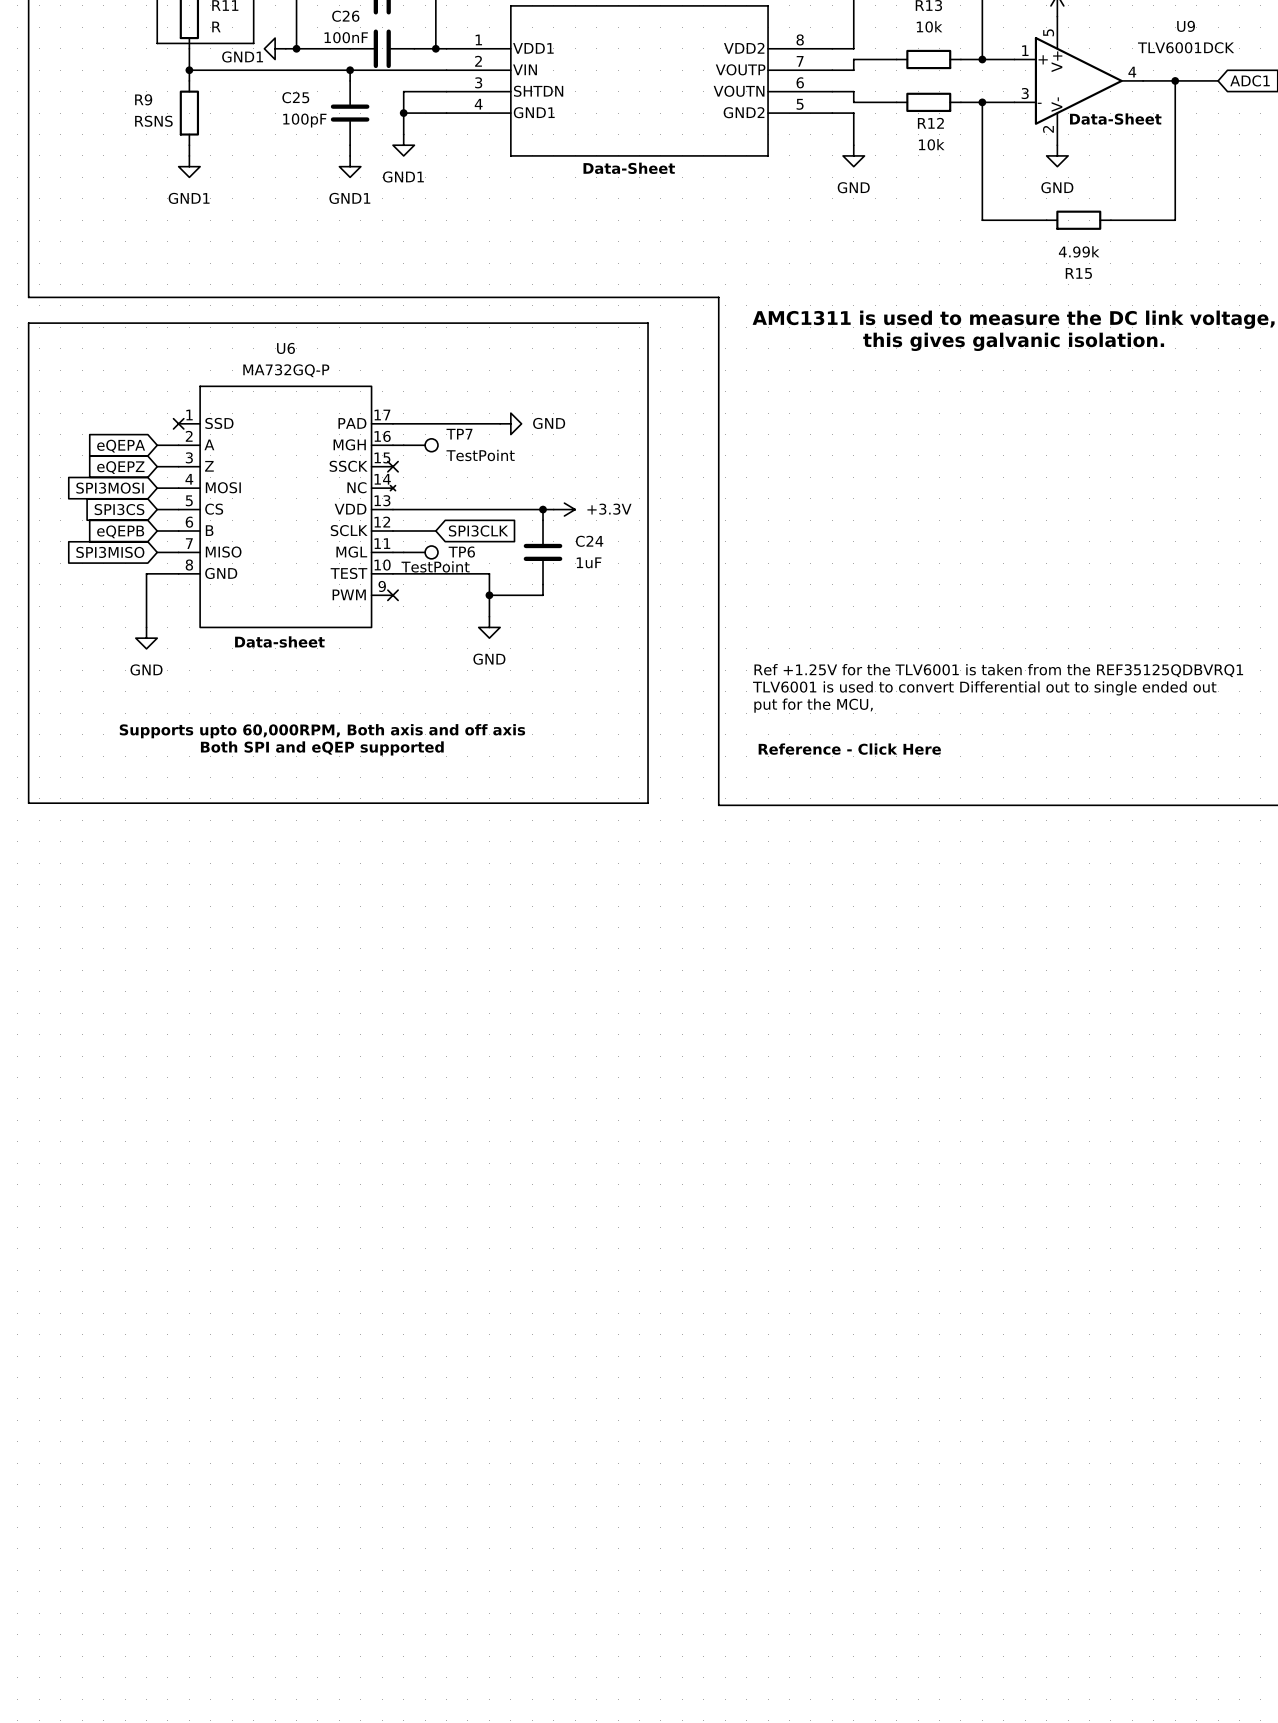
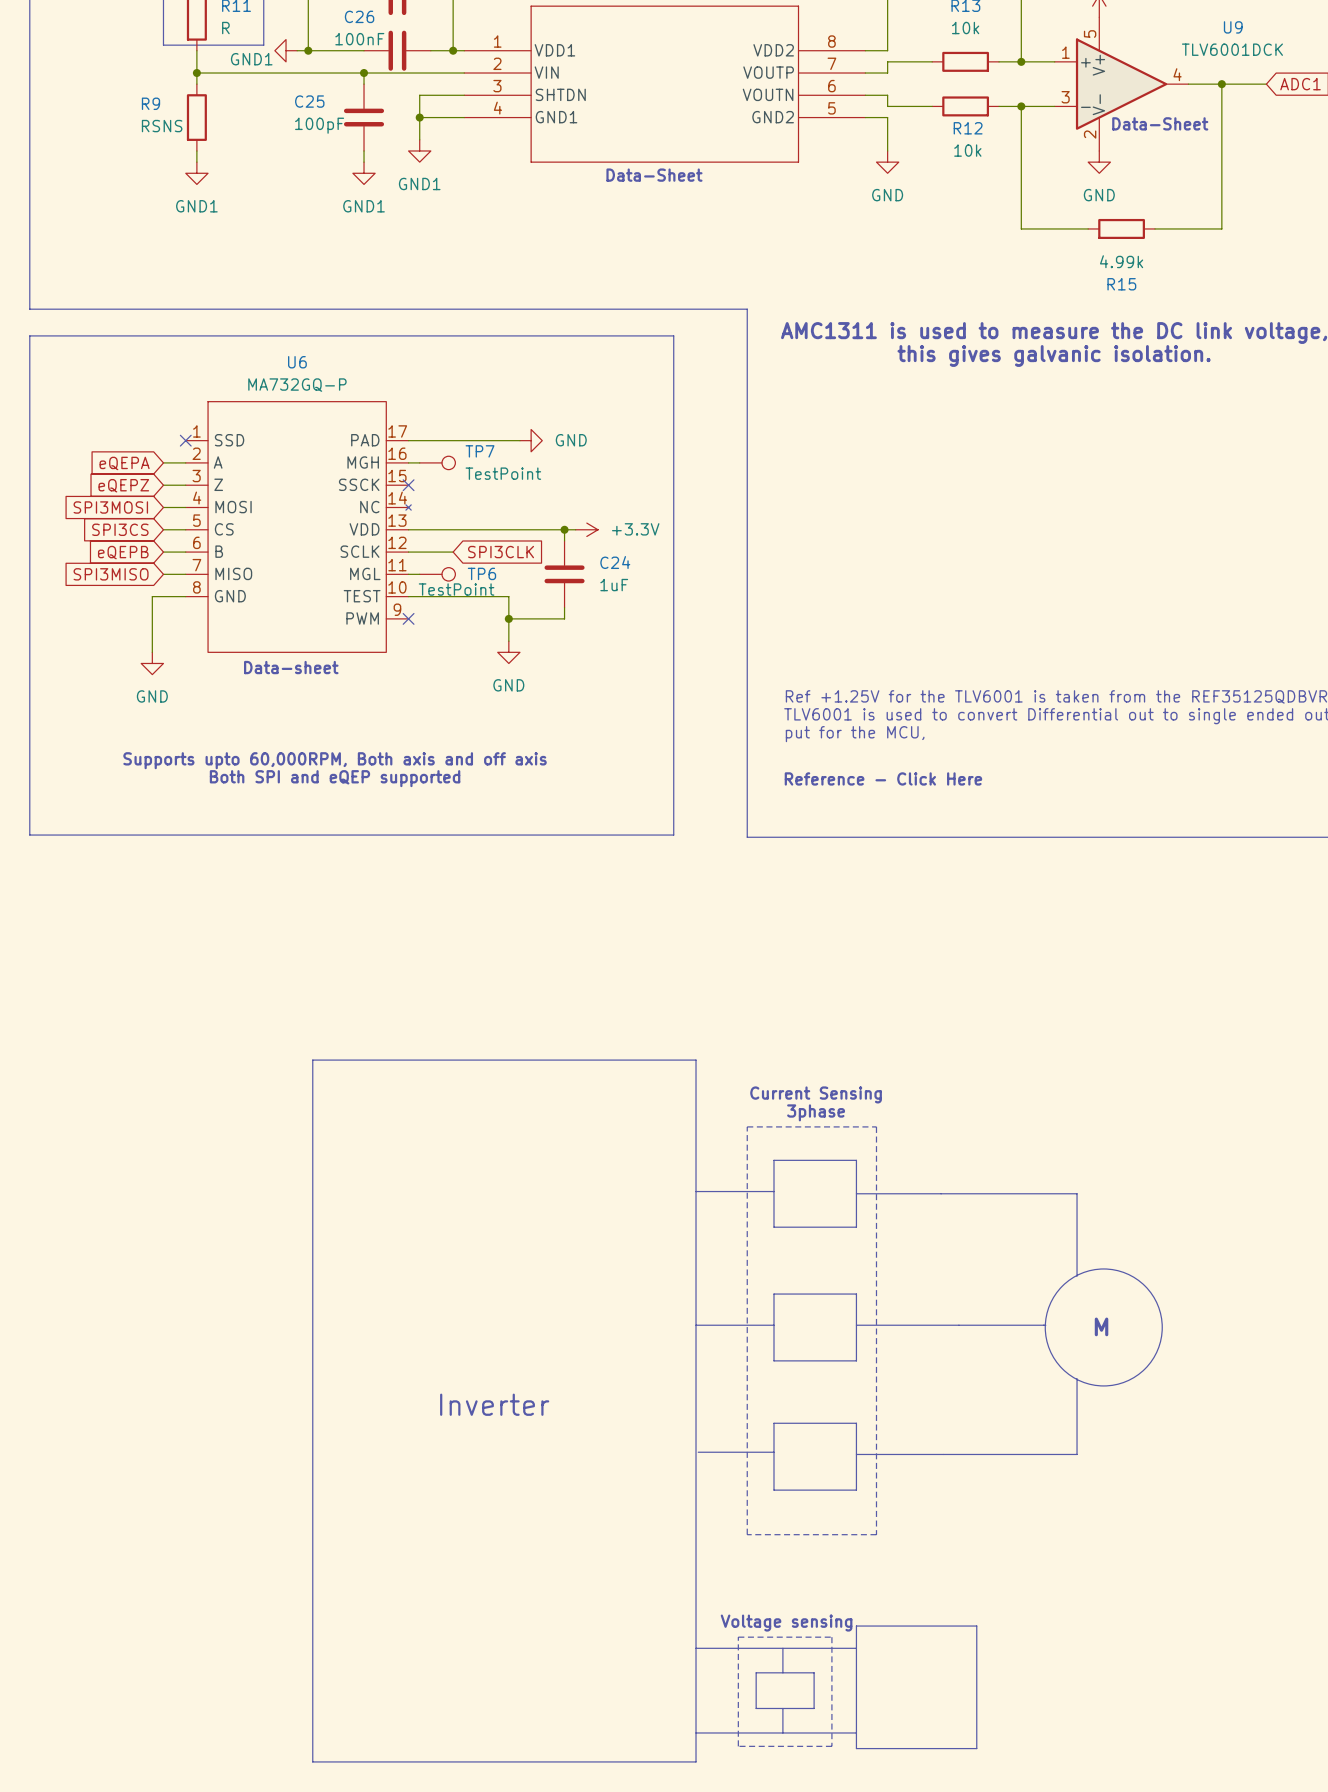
line: none -> (312, 1060) (696, 1060) (696, 1761) (312, 1761) (312, 1060)
text: none -> Current Sensing (816, 1094)
text: none -> 3phase (816, 1112)
line: none -> (747, 1126) (876, 1126) (876, 1534) (747, 1534) (747, 1126)
line: none -> (773, 1160) (773, 1227) (856, 1227) (856, 1160) (773, 1160)
line: none -> (696, 1191) (773, 1191)
line: none -> (856, 1193) (1077, 1193) (1077, 1276)
drawing: none -> [1045, 1268, 1163, 1386]
line: none -> (773, 1294) (856, 1294) (856, 1360) (773, 1360) (773, 1294)
line: none -> (696, 1325) (773, 1325)
line: none -> (856, 1325) (1045, 1325)
text: none -> M (1101, 1326)
line: none -> (1077, 1378) (1077, 1454) (856, 1454)
text: none -> Inverter (494, 1404)
line: none -> (773, 1423) (773, 1490) (856, 1490) (856, 1423) (773, 1423)
line: none -> (698, 1452) (773, 1452)
text: none -> Voltage sensing (786, 1623)
line: none -> (856, 1626) (976, 1626) (976, 1748) (856, 1748) (856, 1626)
line: none -> (738, 1637) (831, 1637) (831, 1746) (738, 1746) (738, 1637)
line: none -> (696, 1648) (856, 1648)
line: none -> (782, 1648) (782, 1672)
line: none -> (756, 1672) (814, 1672) (814, 1708) (756, 1708) (756, 1672)
line: none -> (782, 1708) (782, 1732)
line: none -> (696, 1732) (856, 1732)

